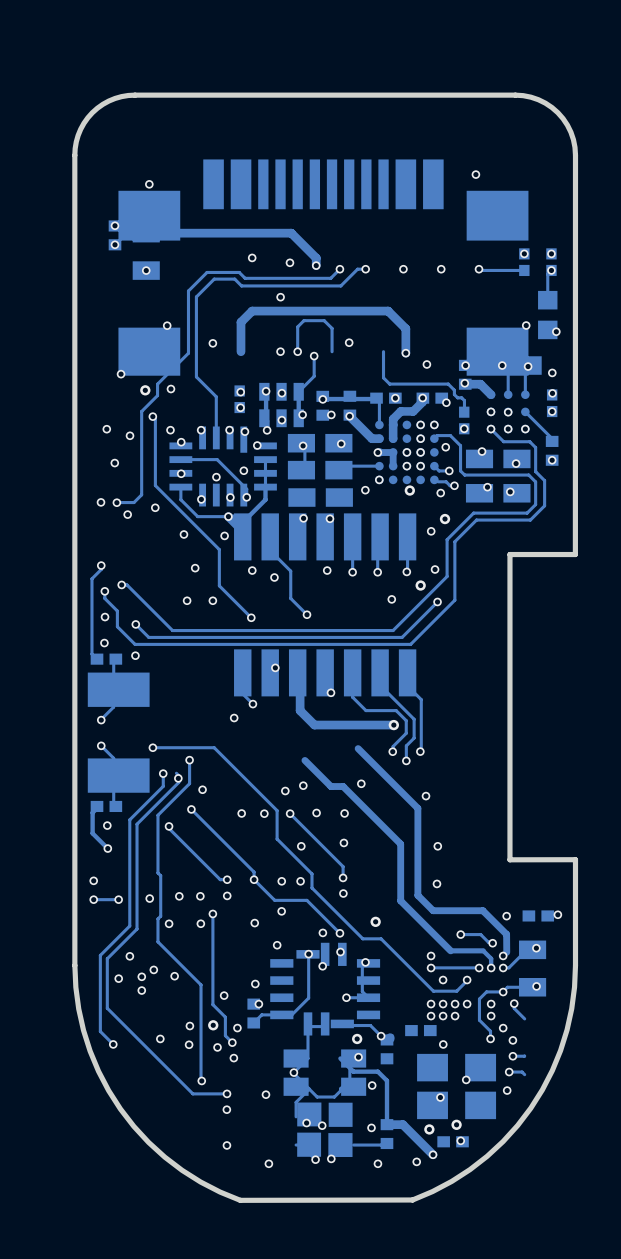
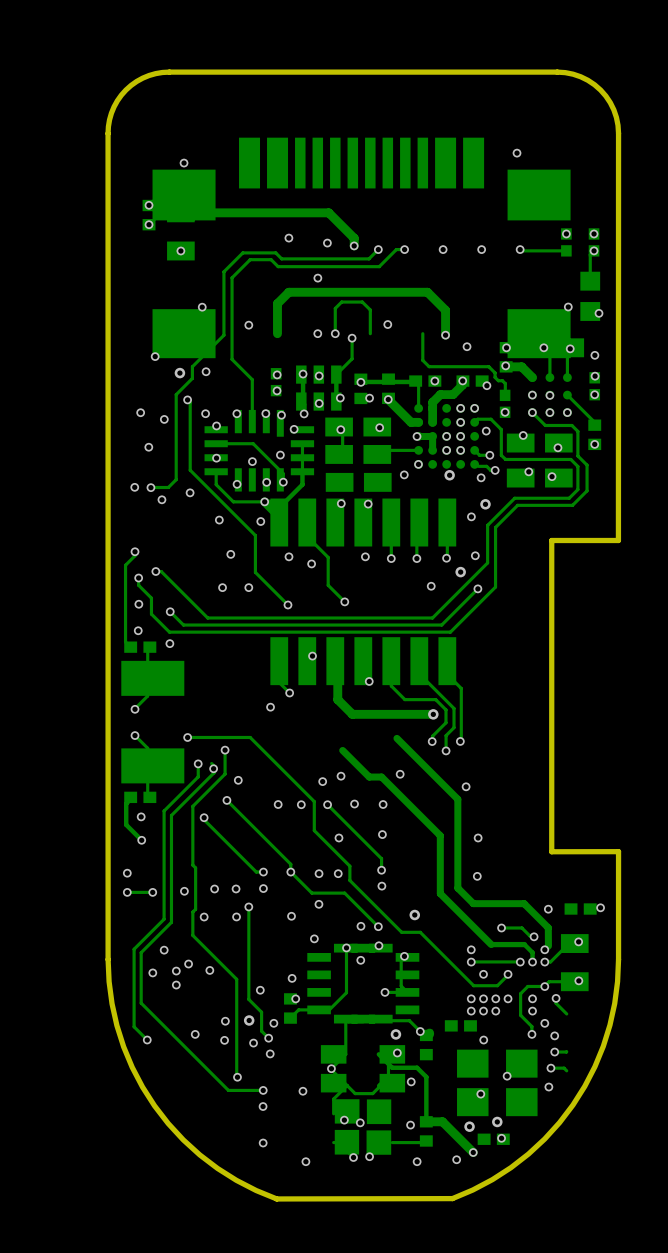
part footprint: [270, 942, 381, 1036] -> [307, 943, 420, 1024]

